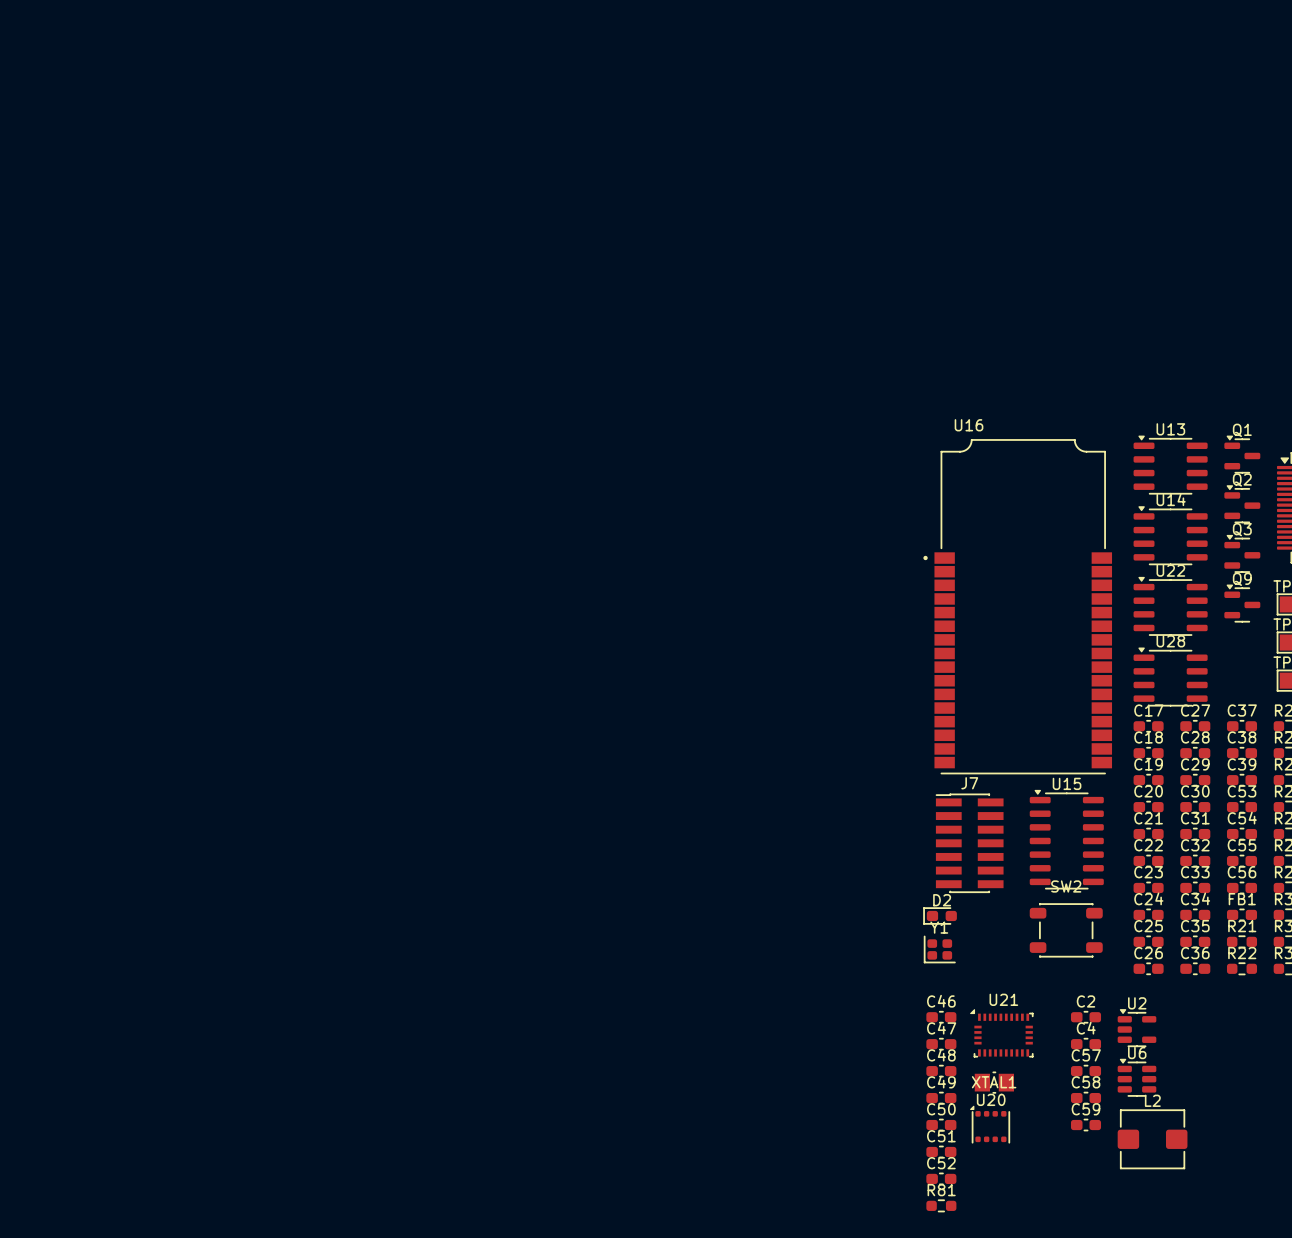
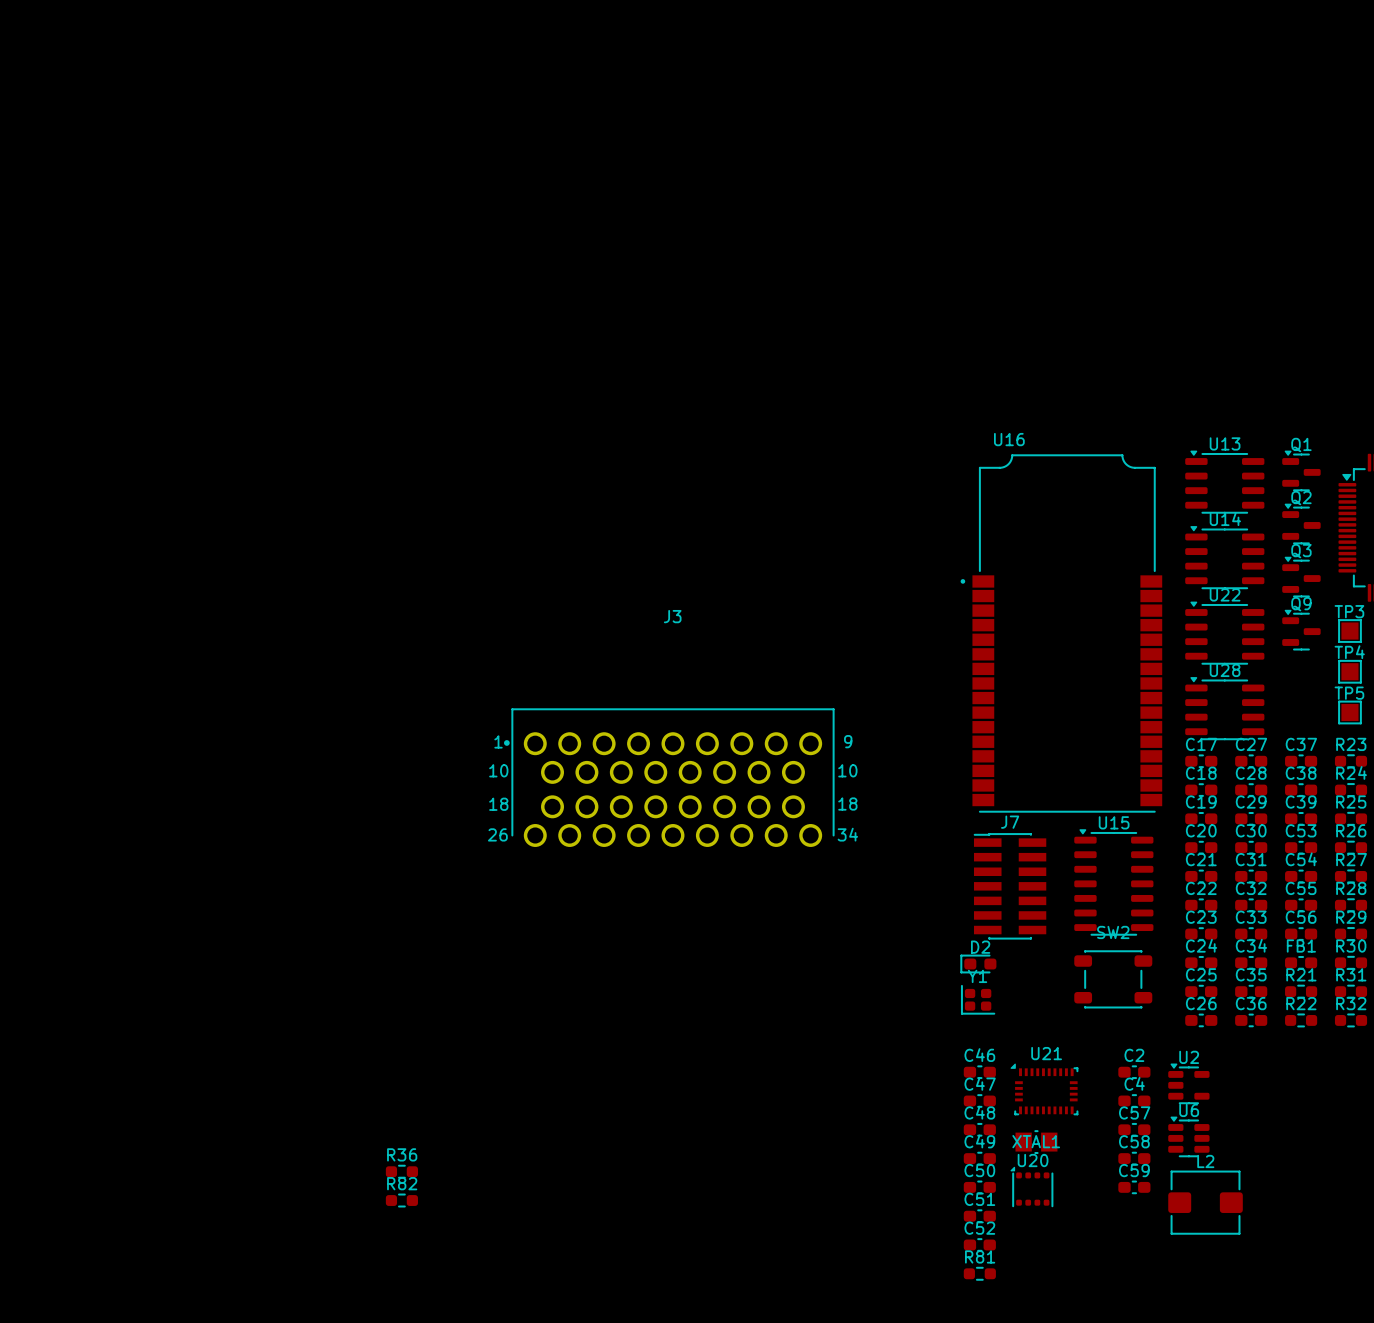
J3: none -> (669, 777)
R36: none -> (401, 1171)
R82: none -> (401, 1200)

